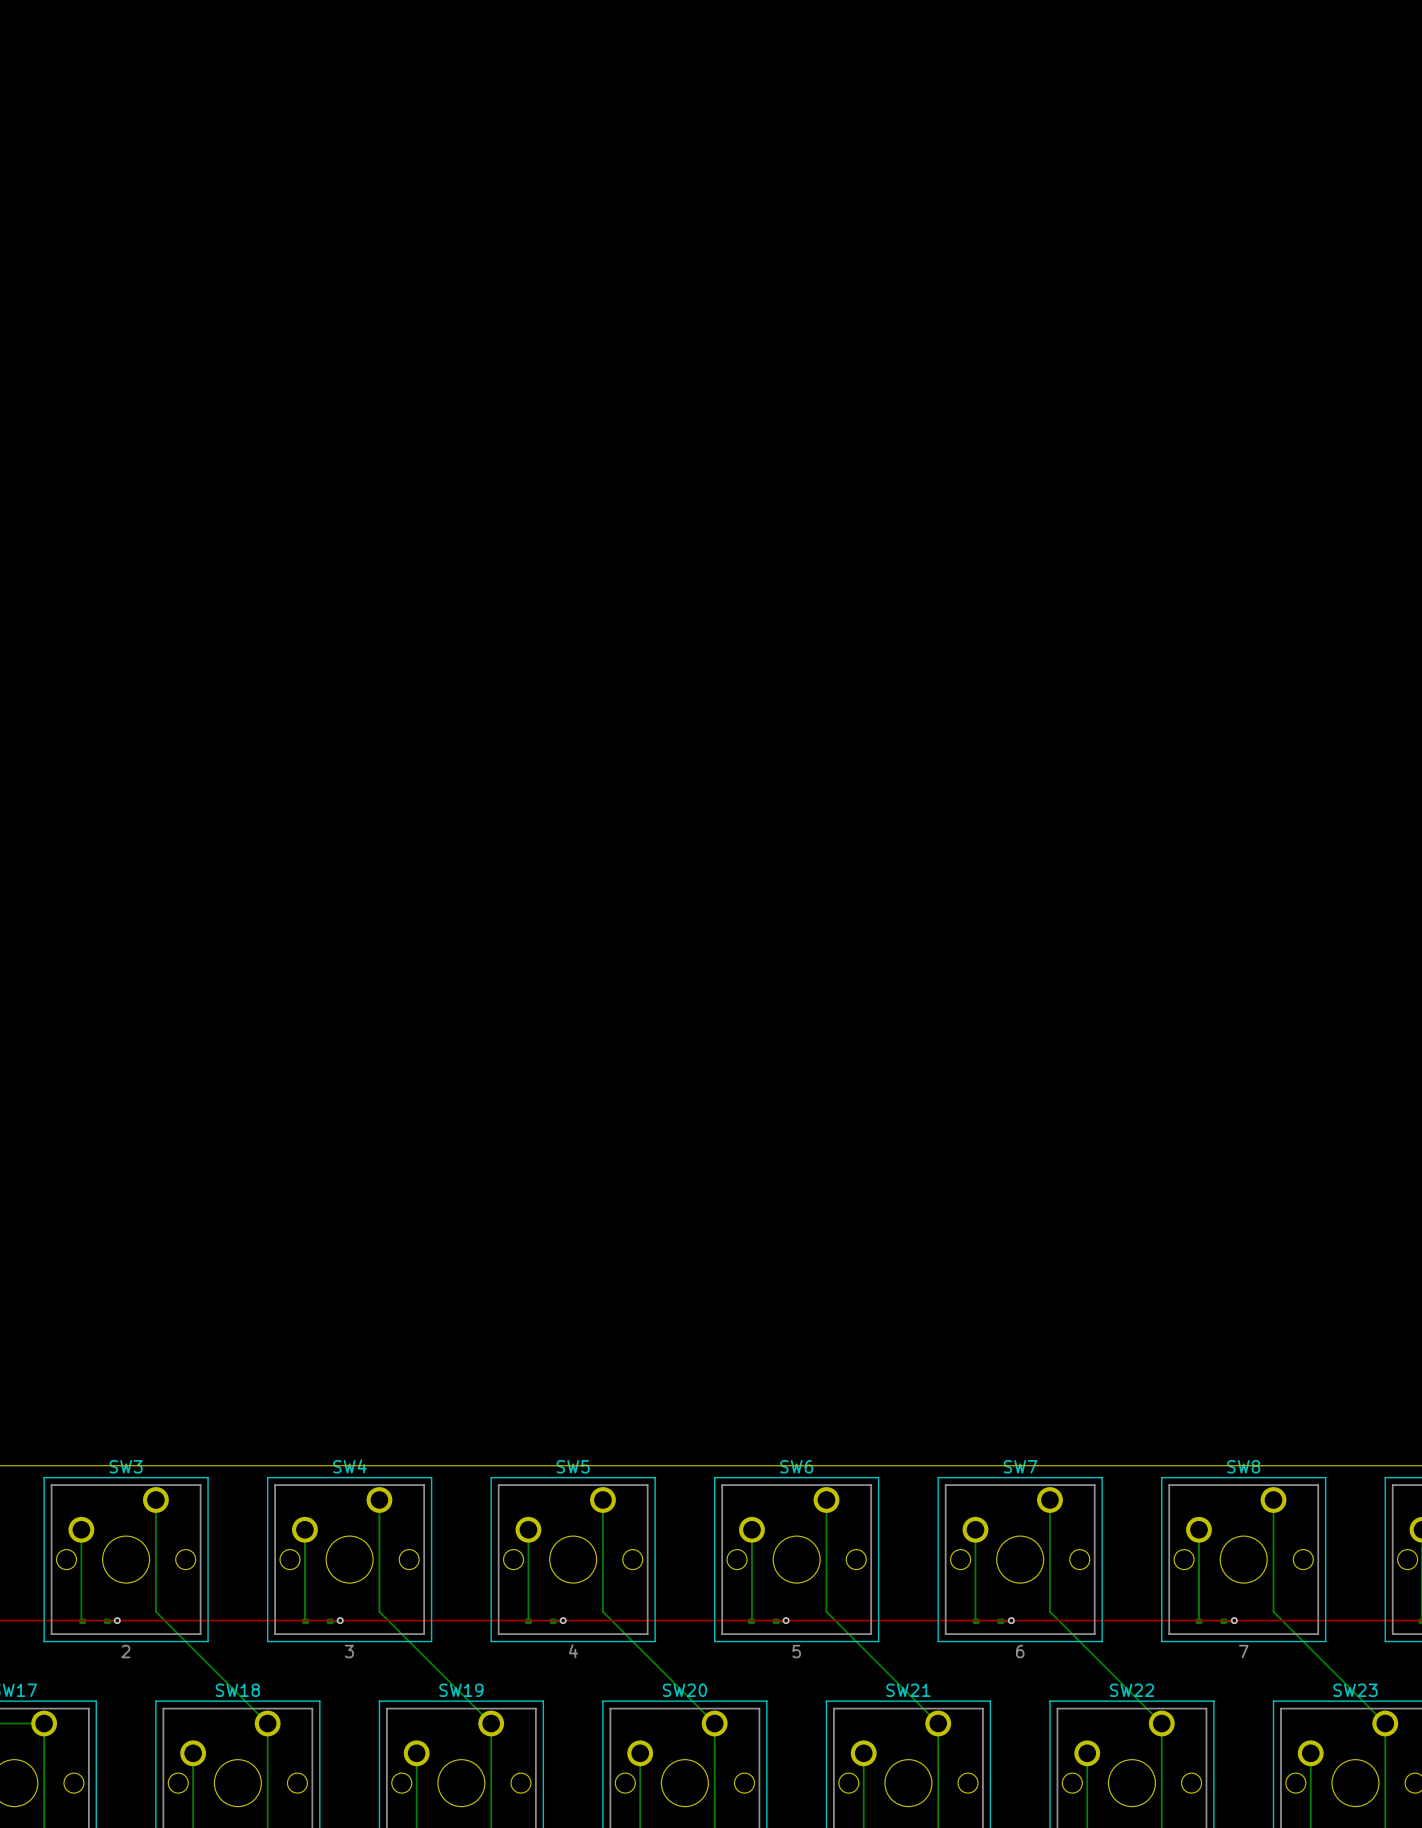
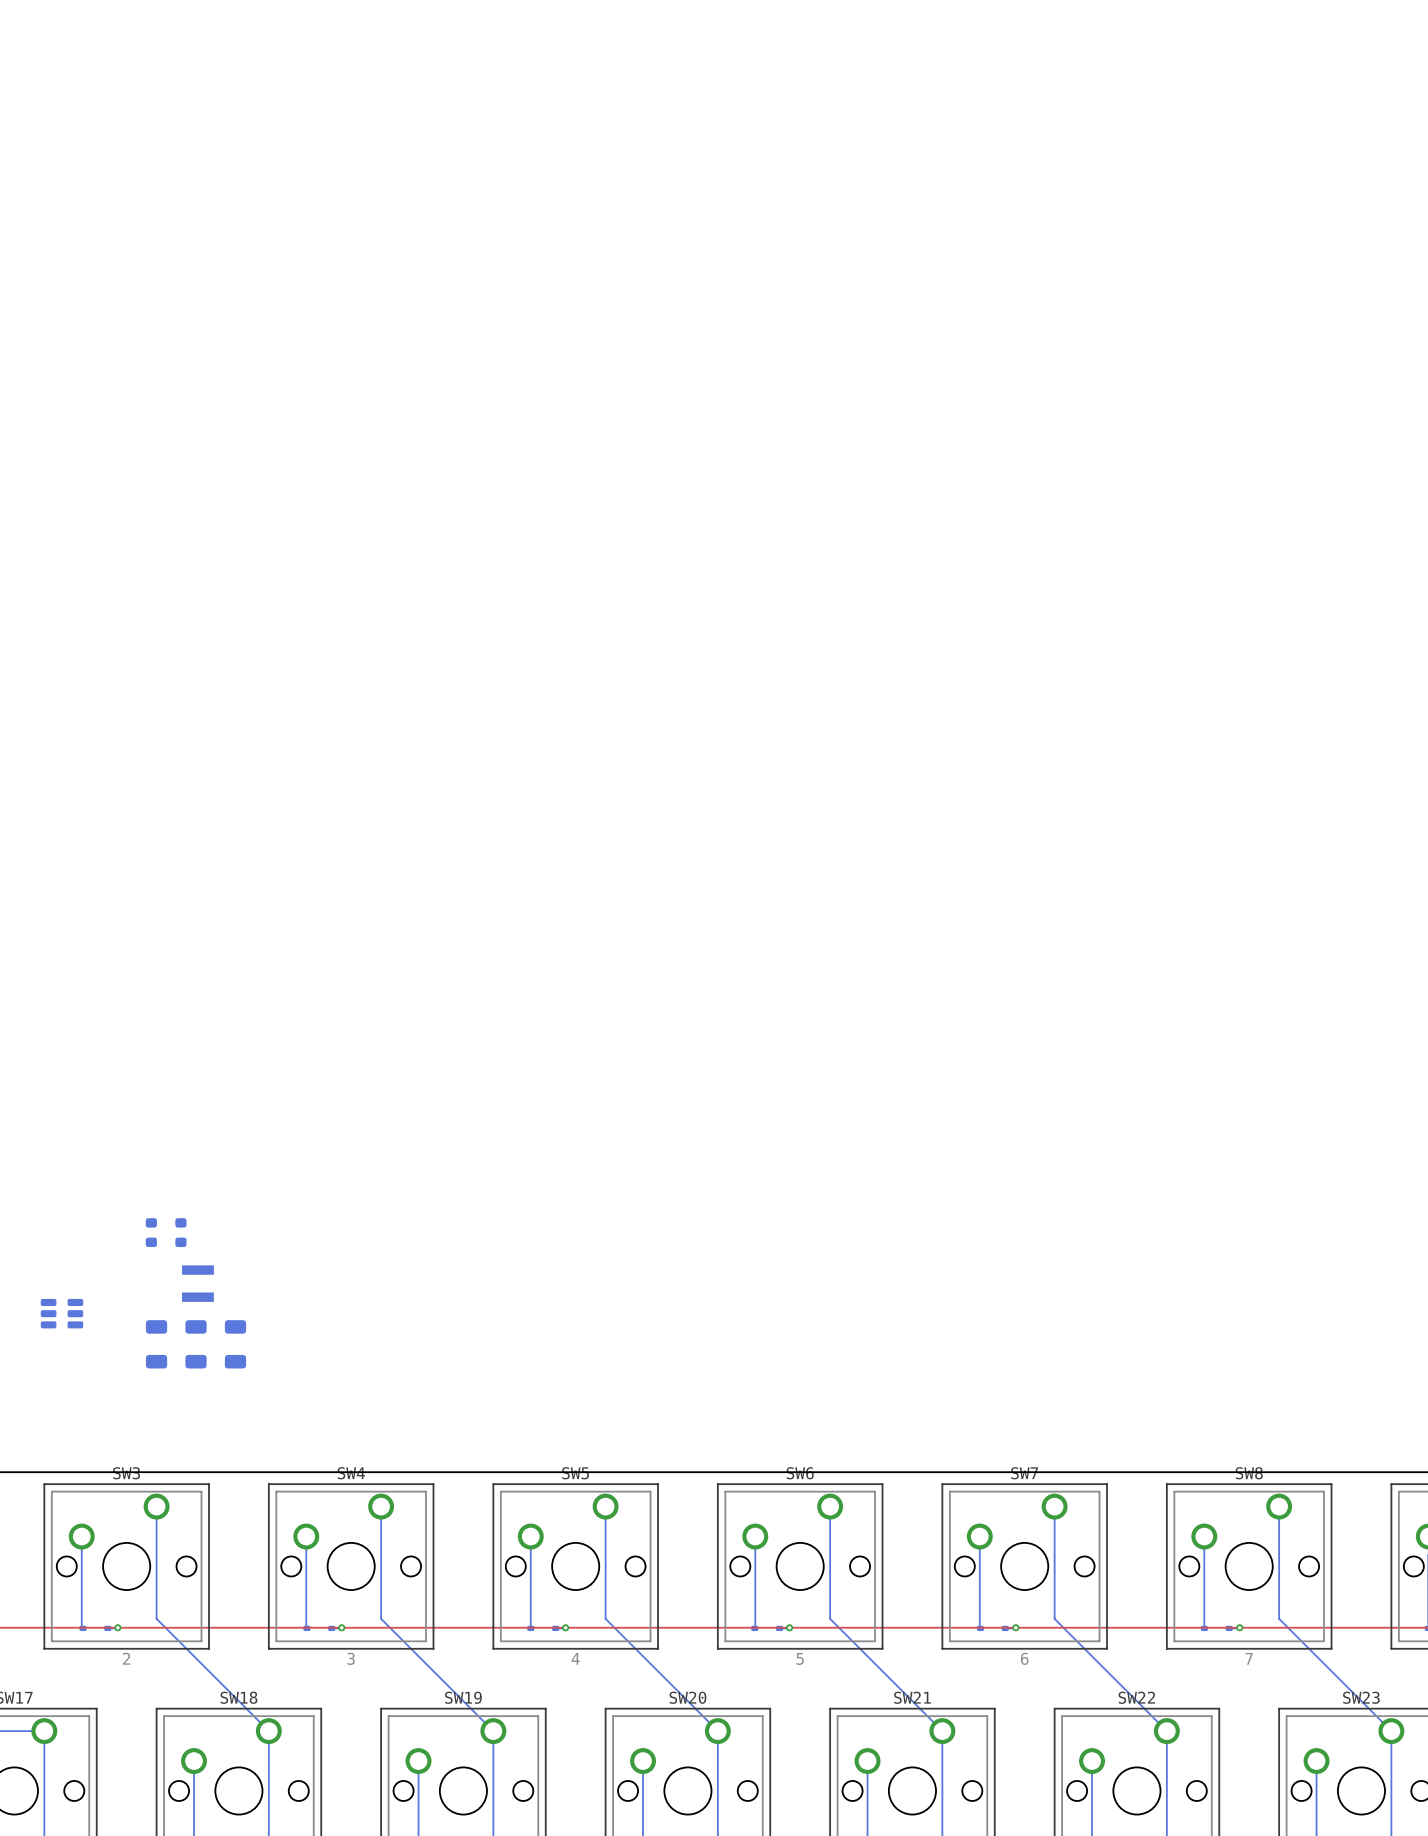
part: none -> (151, 1232)
part: none -> (180, 1232)
part: none -> (197, 1283)
part: none -> (61, 1313)
part: none -> (156, 1344)
part: none -> (196, 1344)
part: none -> (235, 1344)

